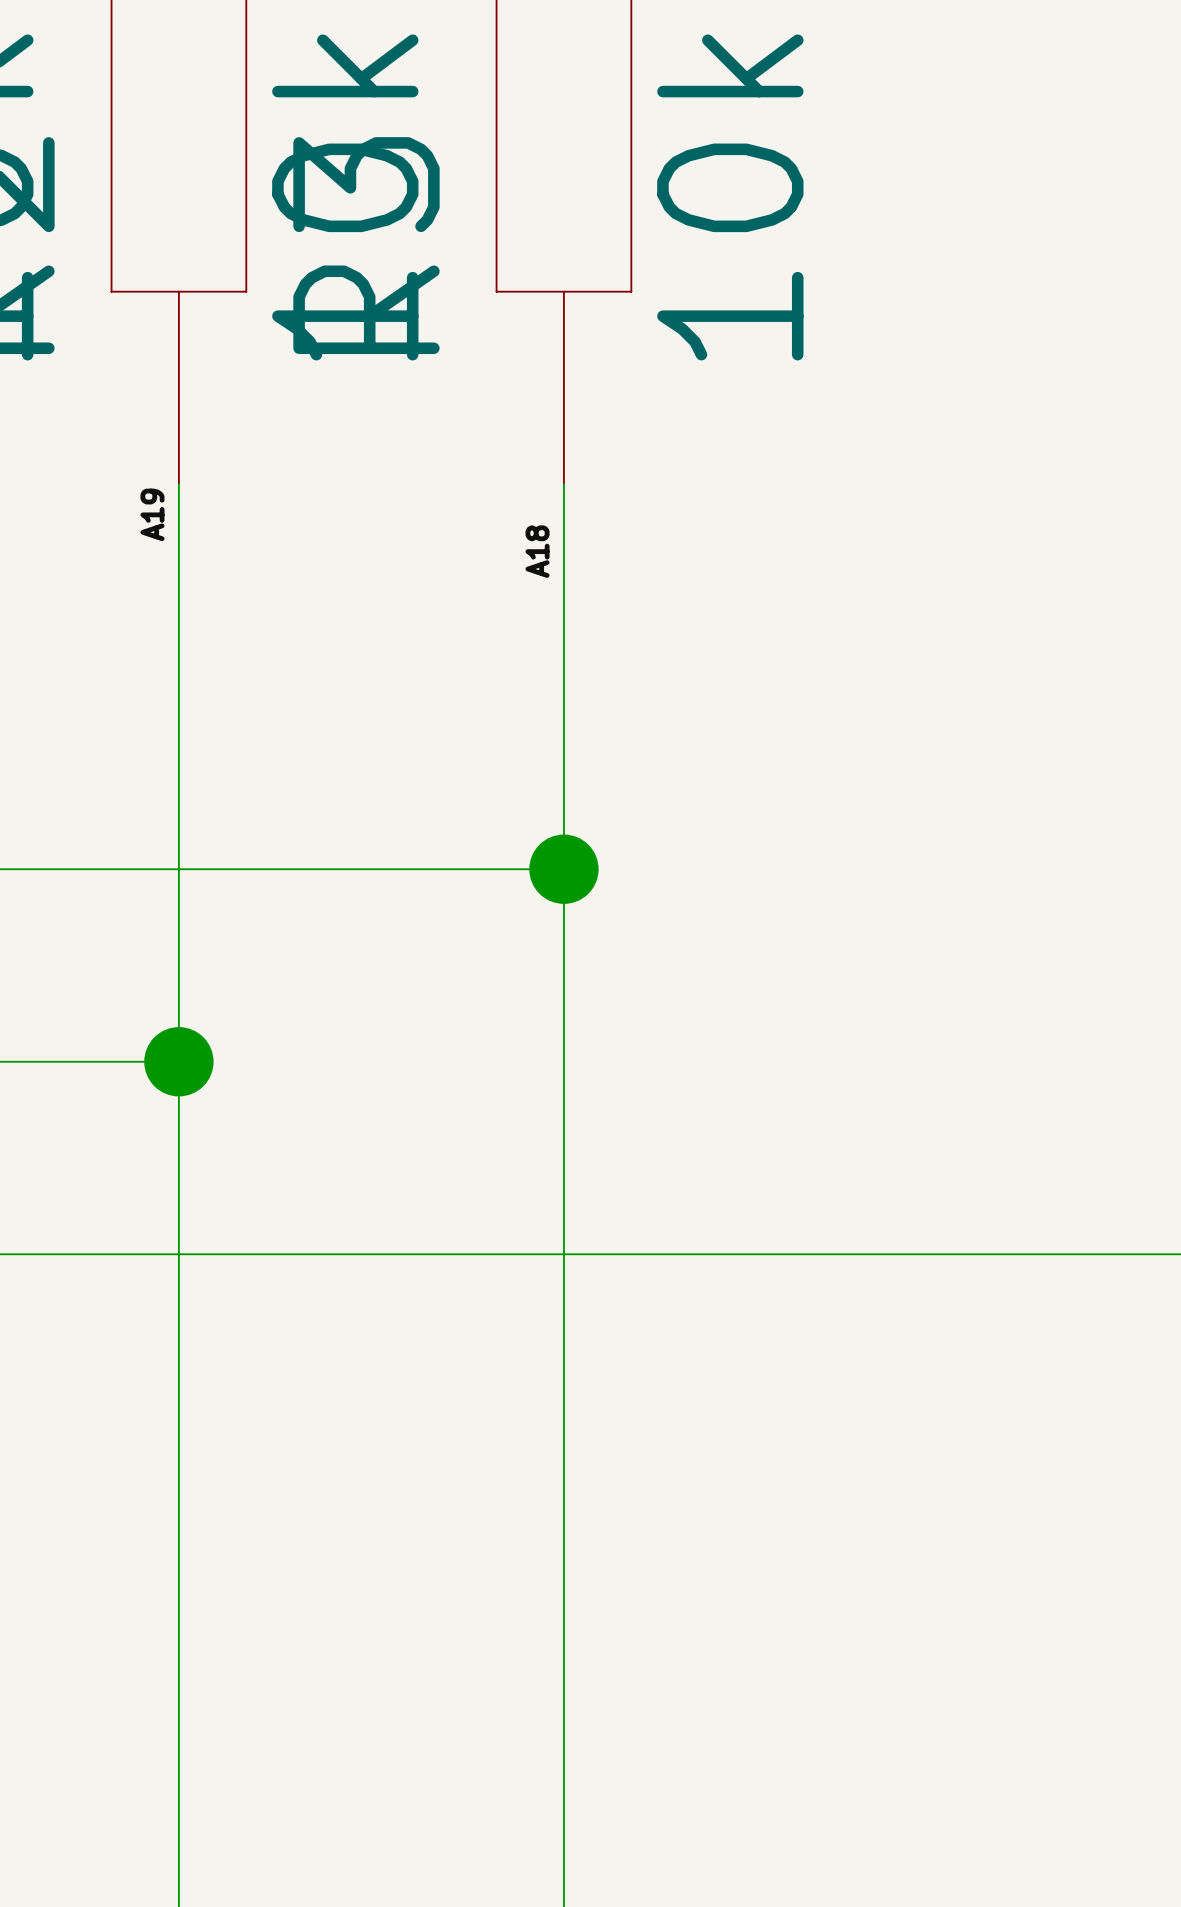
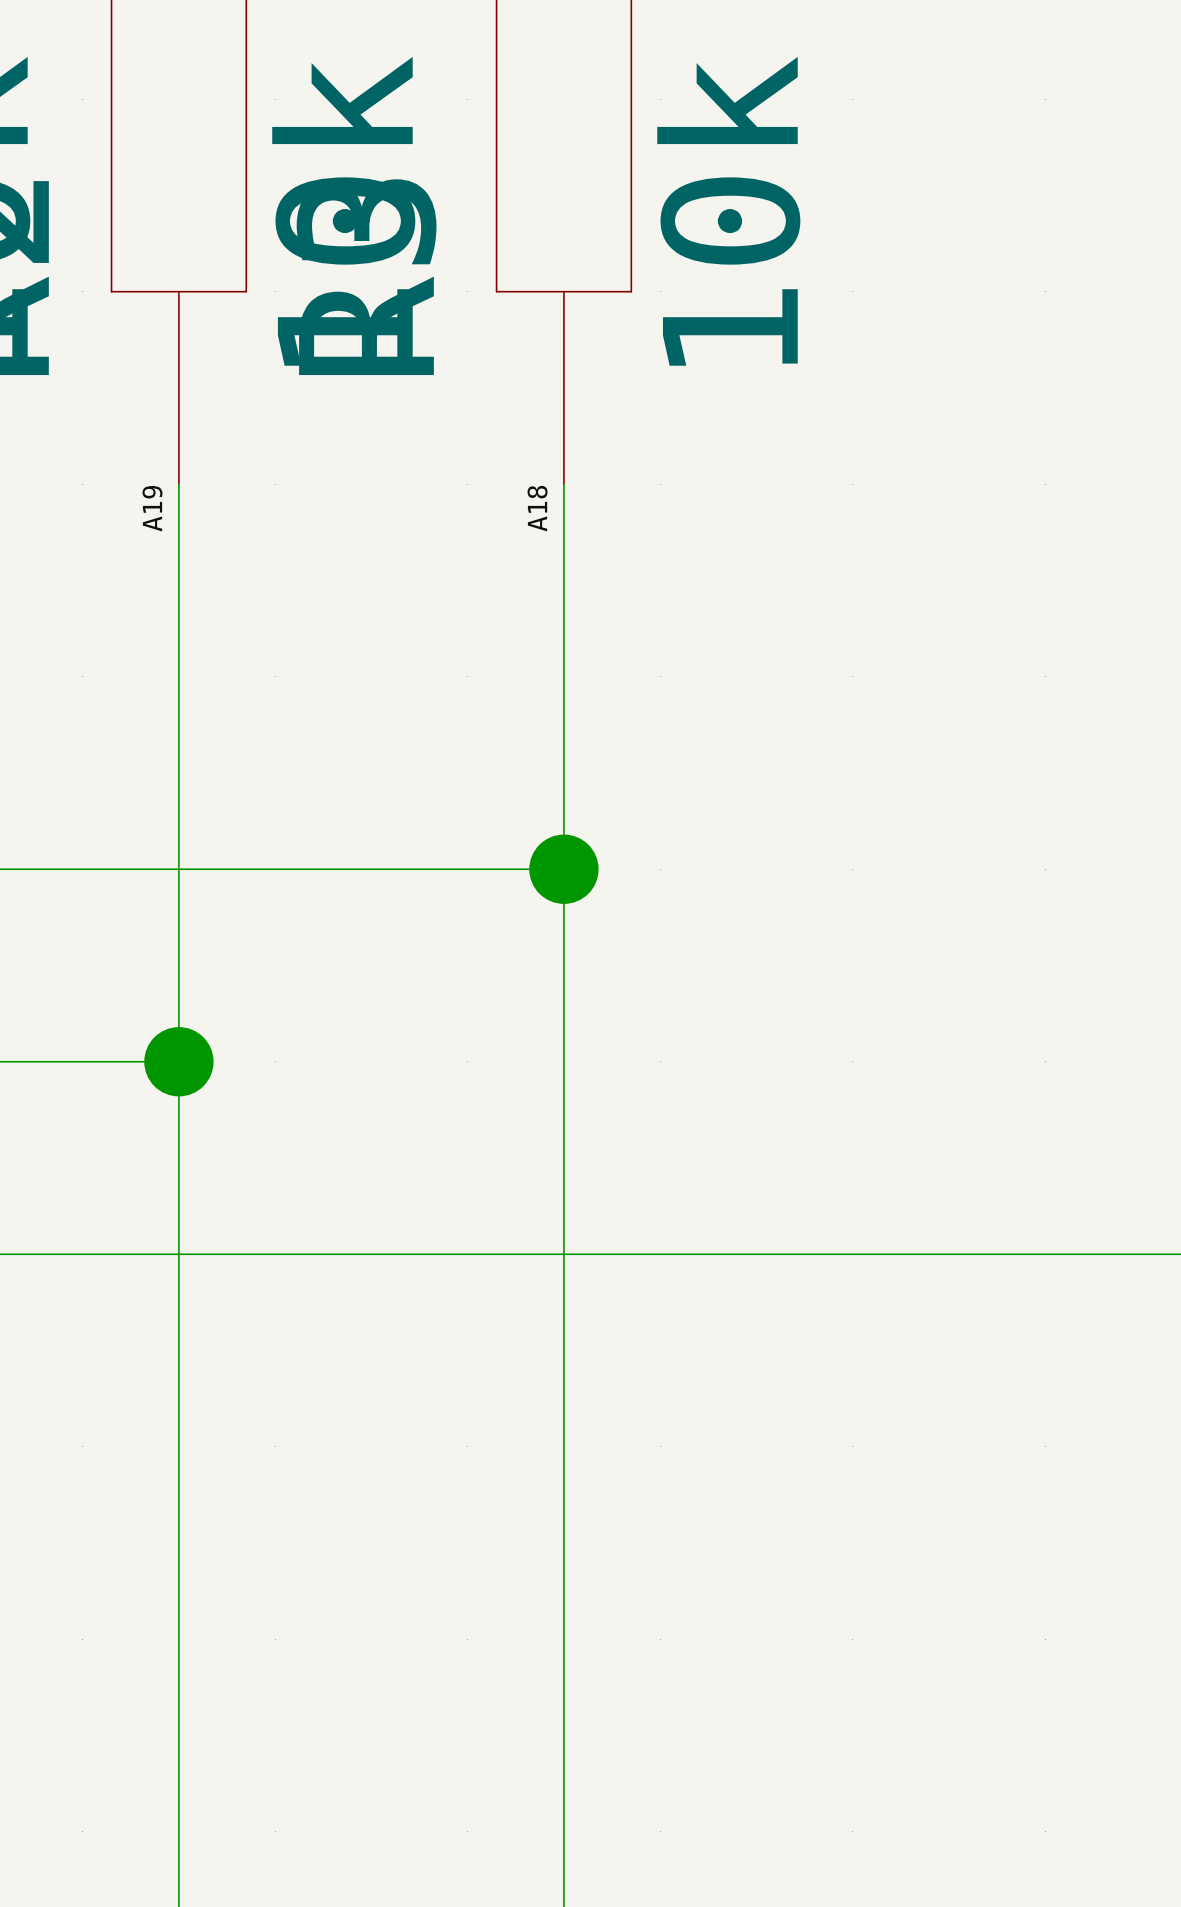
label position: A18 (537, 551) -> A18 (537, 508)

